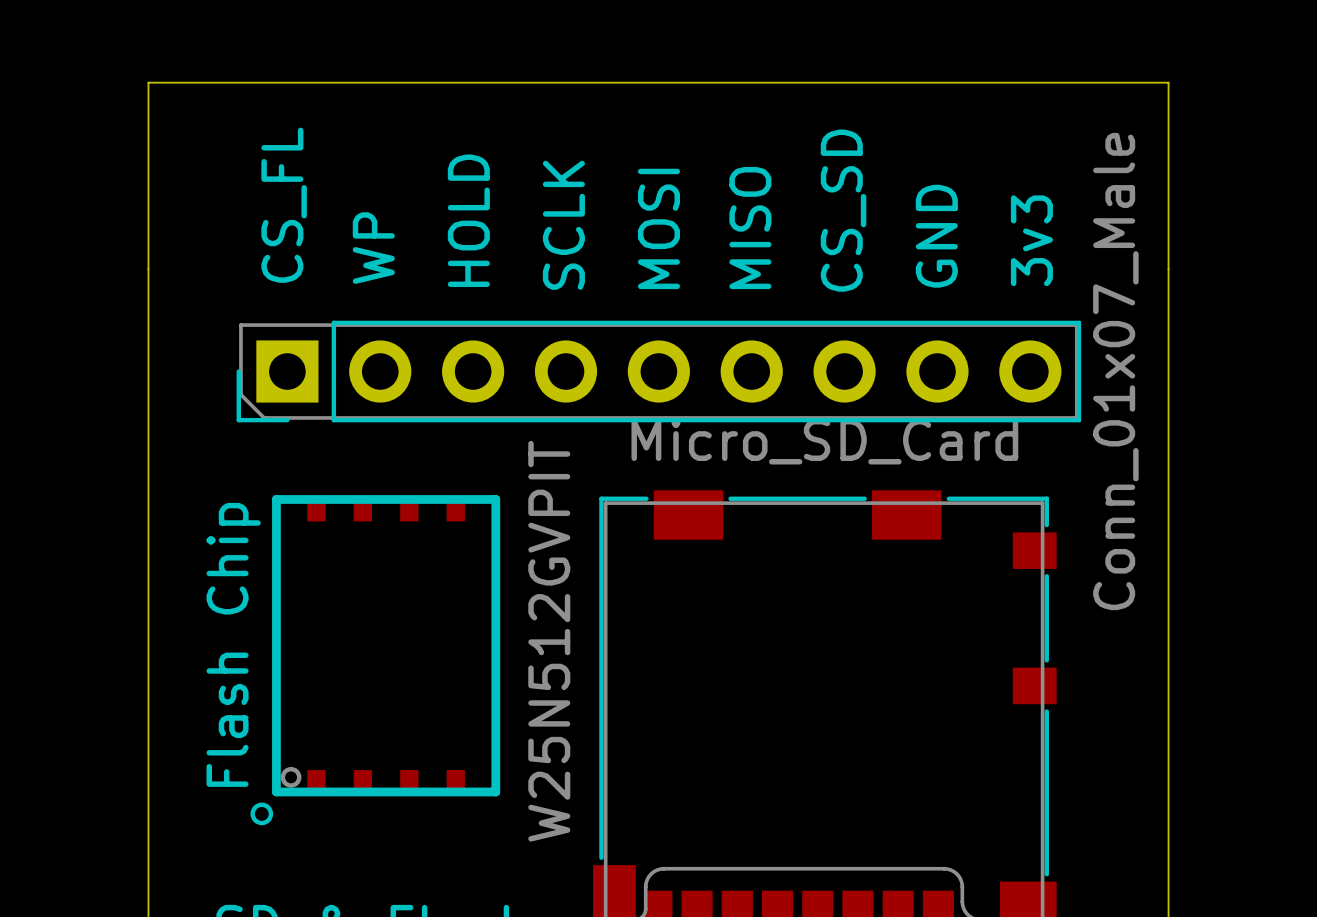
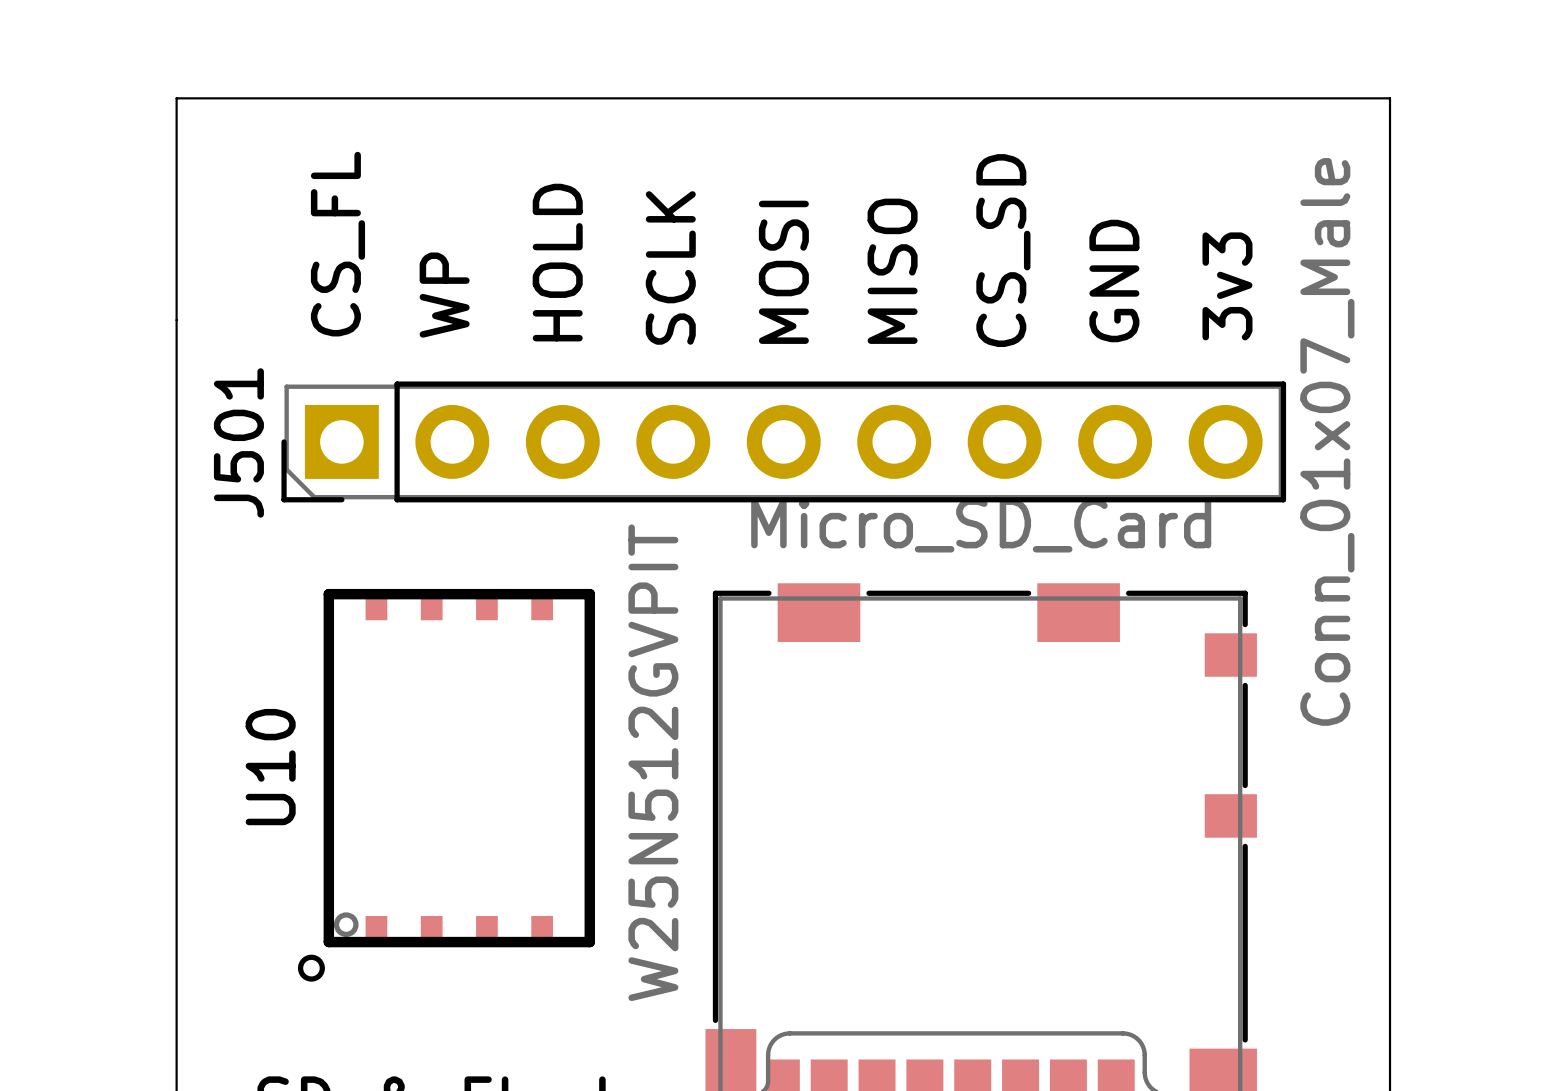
J501 name: none -> J501 (238, 442)
Flash Chip name: Flash Chip (233, 644) -> U10 (270, 767)

